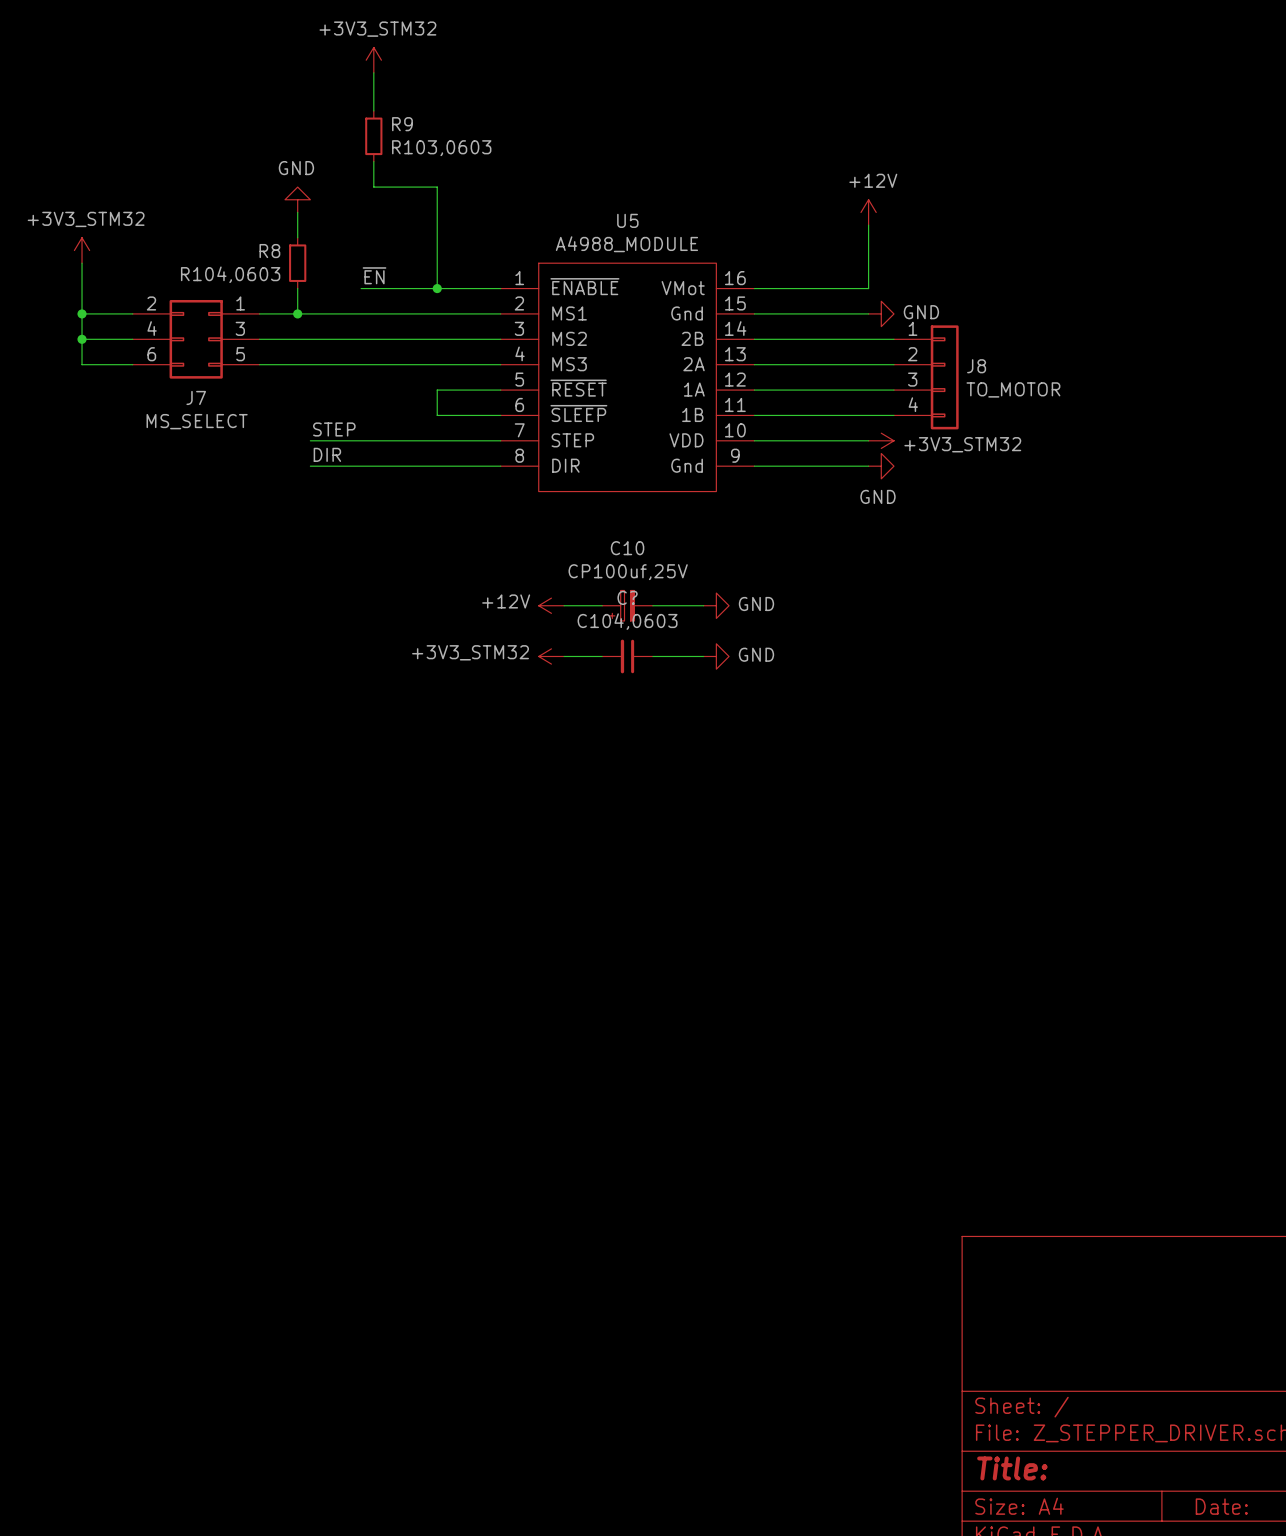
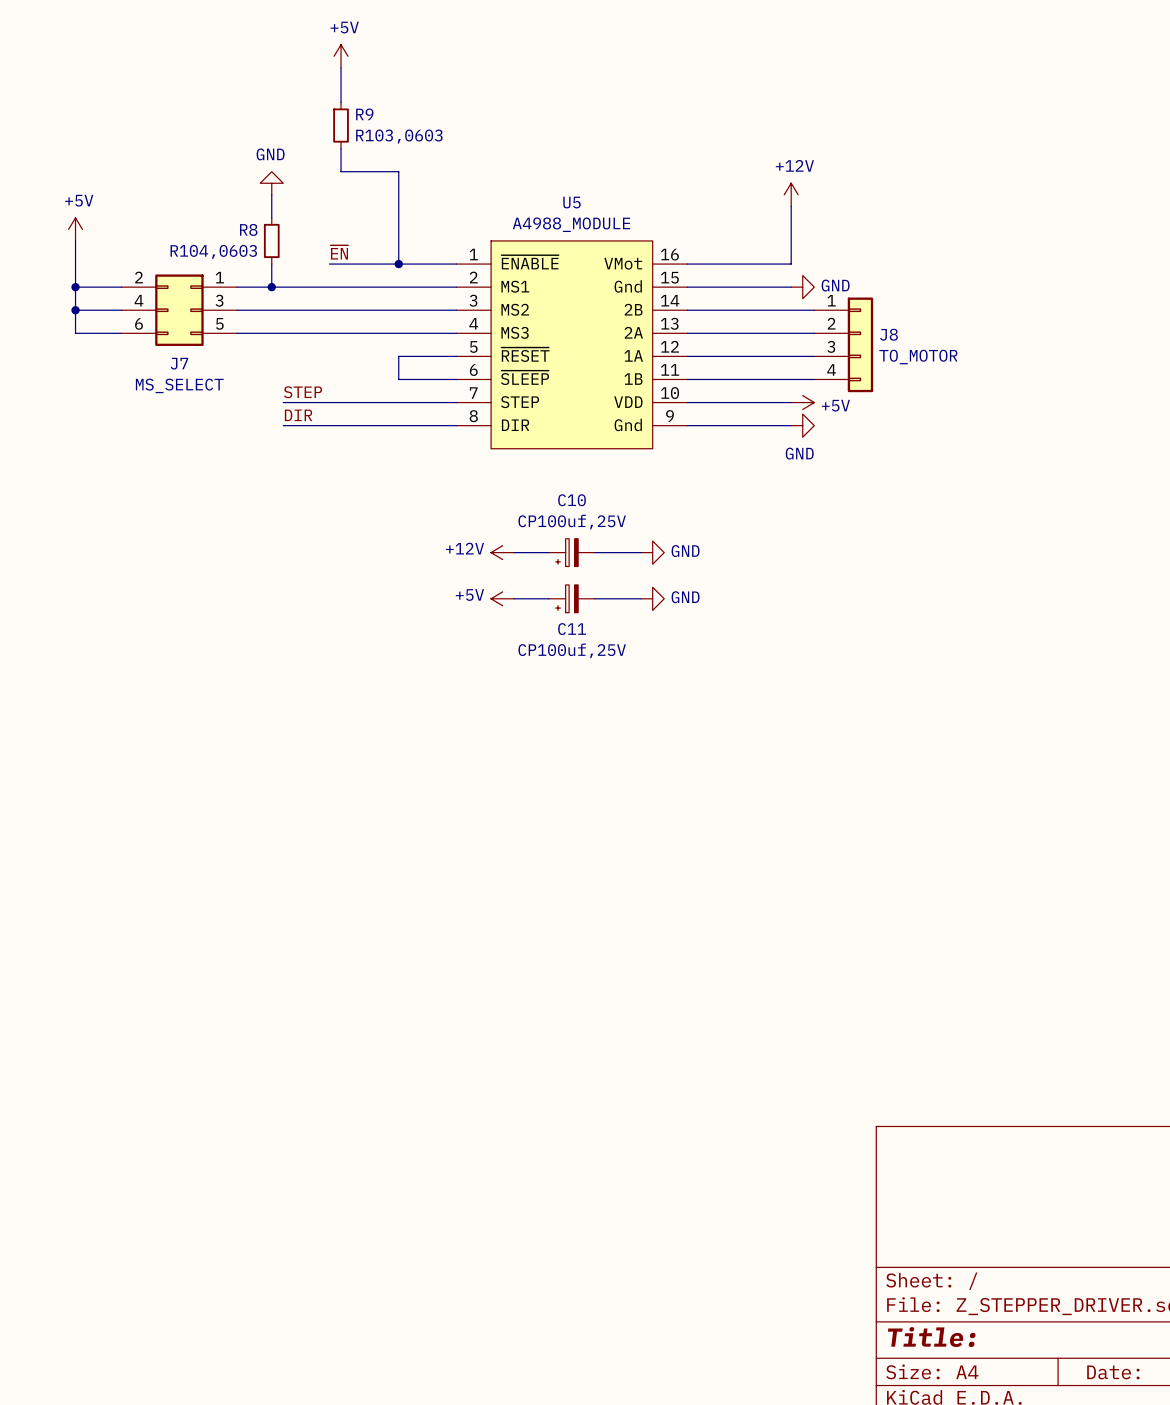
power symbol: +3V3_STM32 (373, 60) -> +5V (341, 56)
power symbol: +3V3_STM32 (82, 250) -> +5V (75, 229)
power symbol: +3V3_STM32 (881, 440) -> +5V (802, 402)
power symbol: +3V3_STM32 (551, 656) -> +5V (502, 598)
C?: C104,0603 (627, 656) -> none
C11: none -> CP100uf,25V (571, 598)

